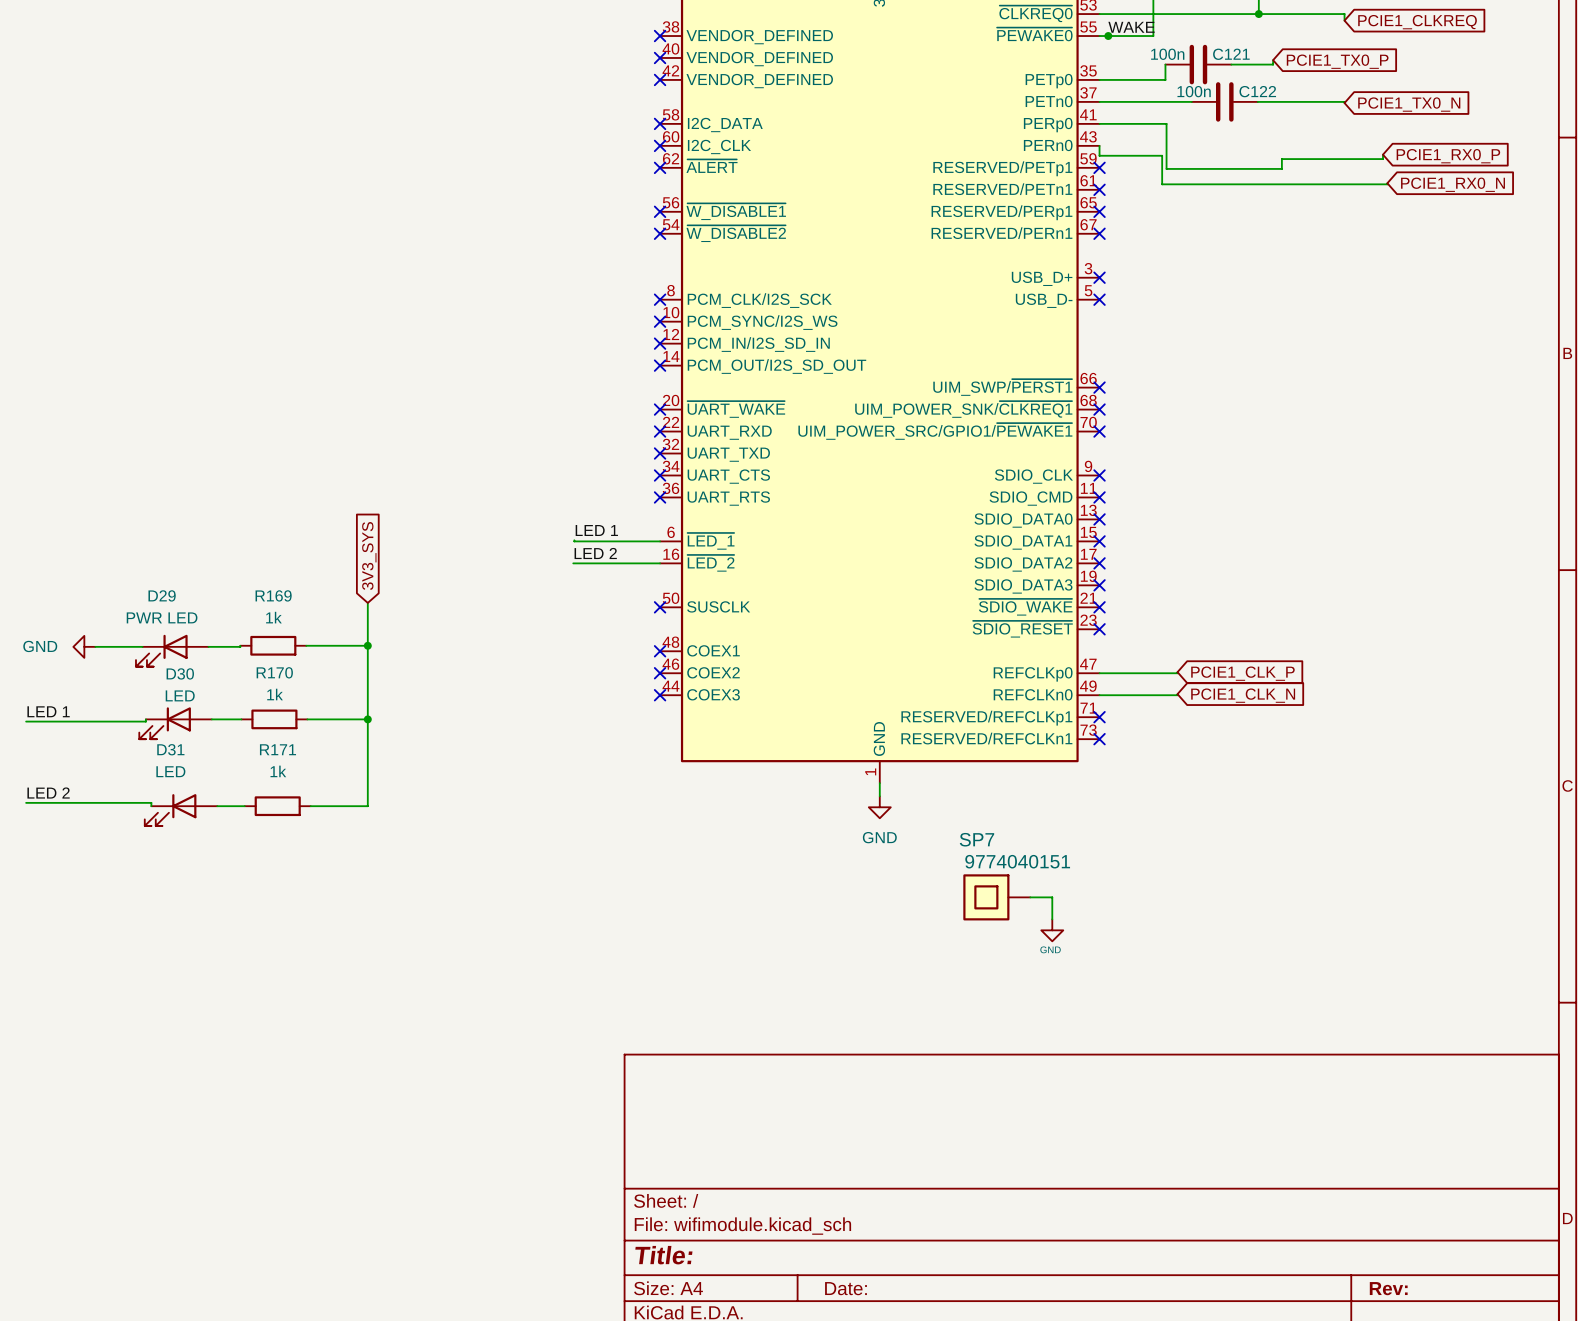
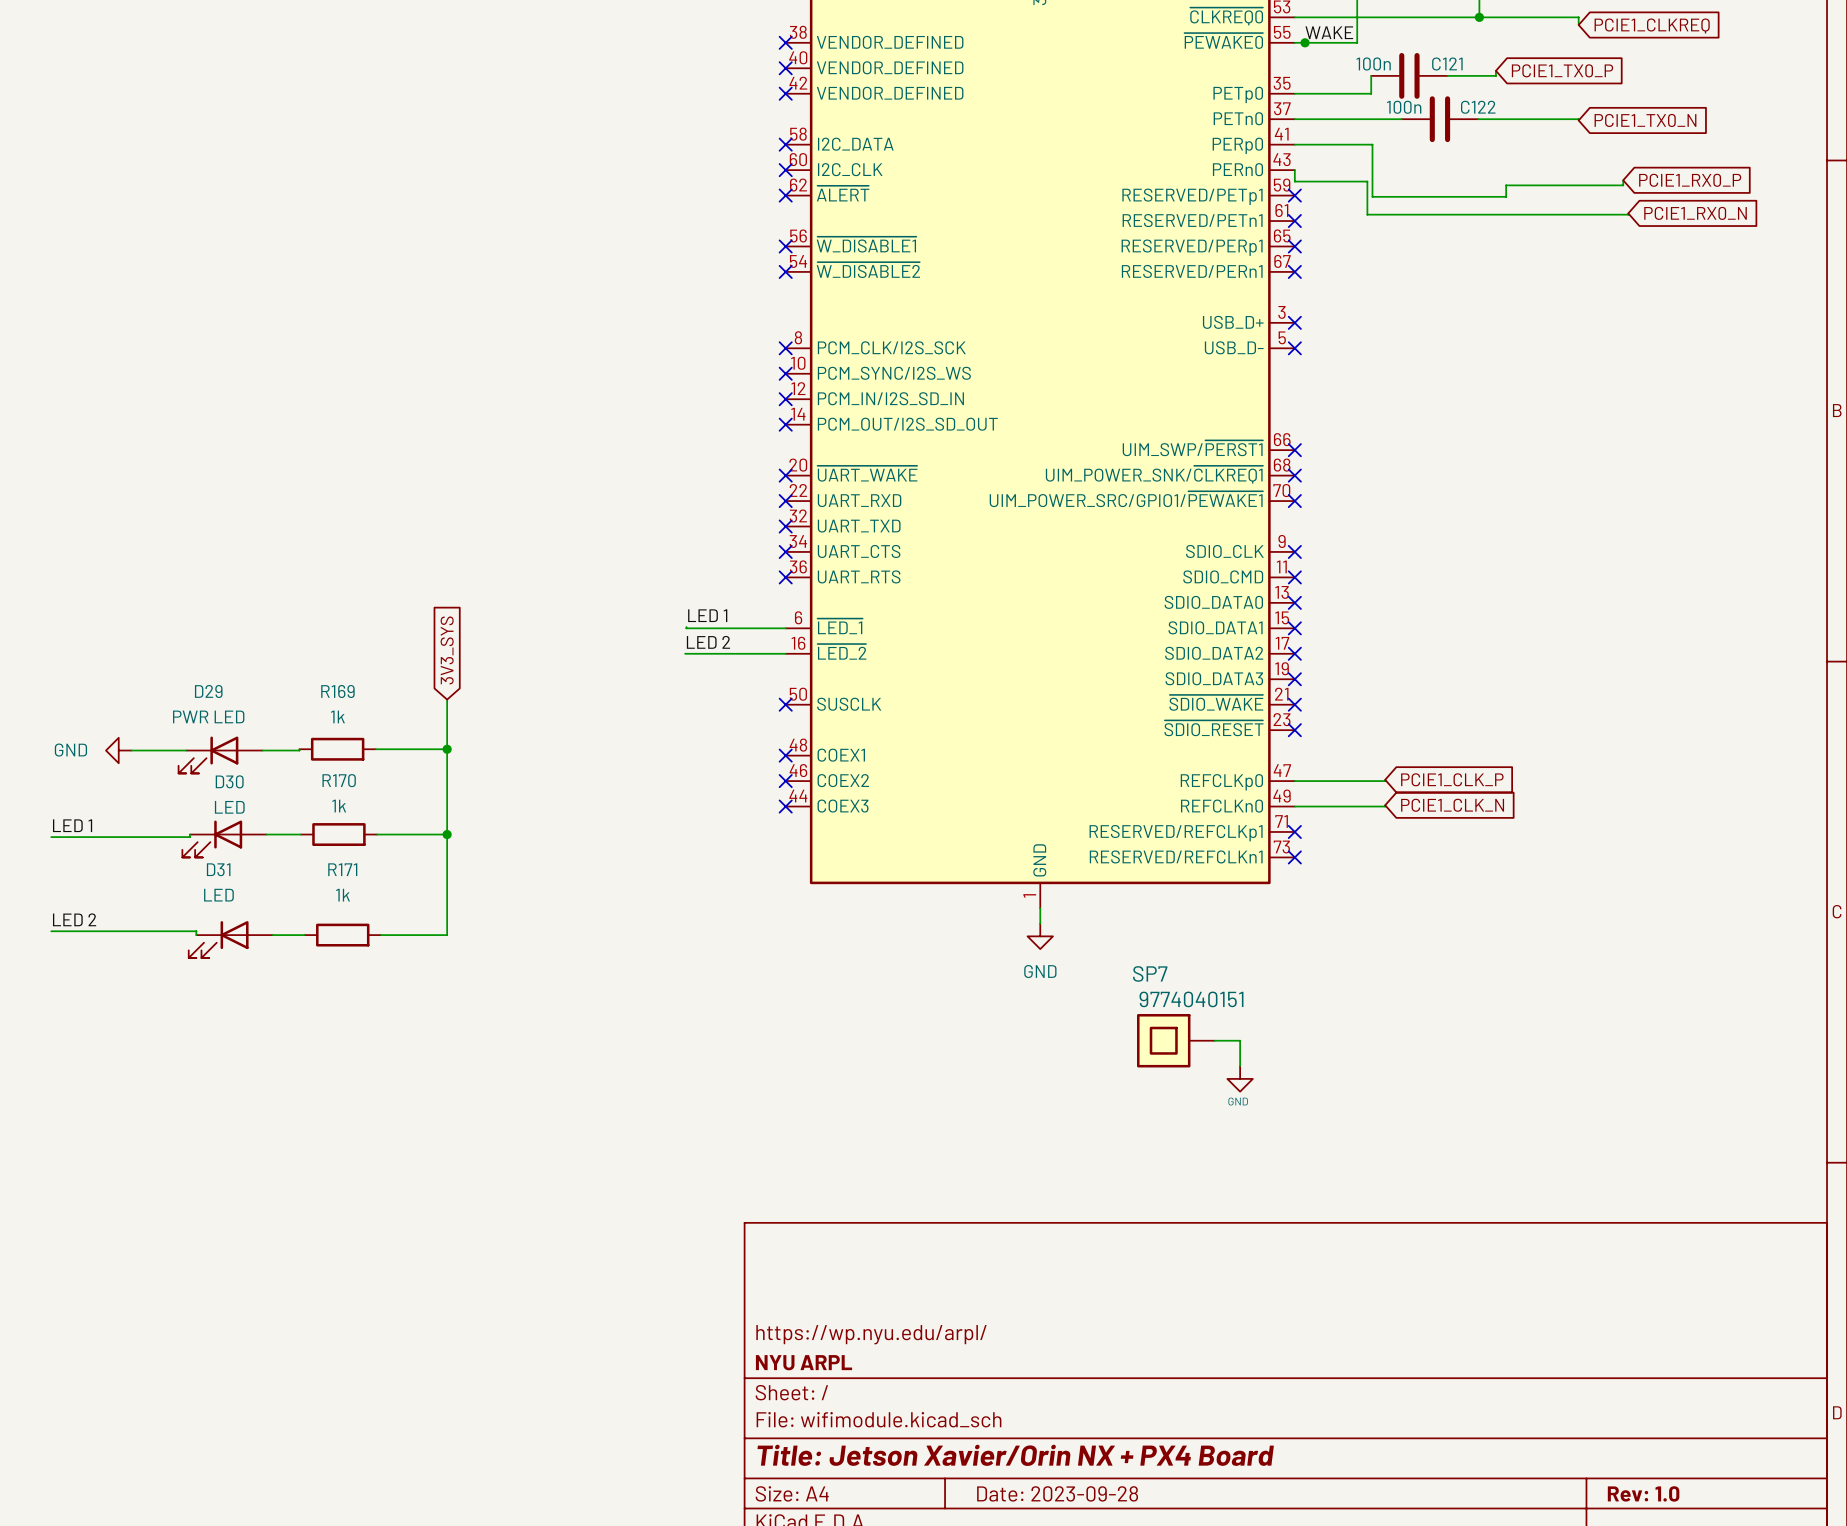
title block: none -> https://wp.nyu.edu/arpl/ (871, 1334)
title block: none -> NYU ARPL (804, 1362)
title block: Title: (663, 1255) -> Title: Jetson Xavier/Orin NX + PX4 Board (1015, 1455)
title block: Date: (846, 1288) -> Date: 2023-09-28 (1057, 1493)
title block: Rev: (1388, 1288) -> Rev: 1.0 (1643, 1493)

